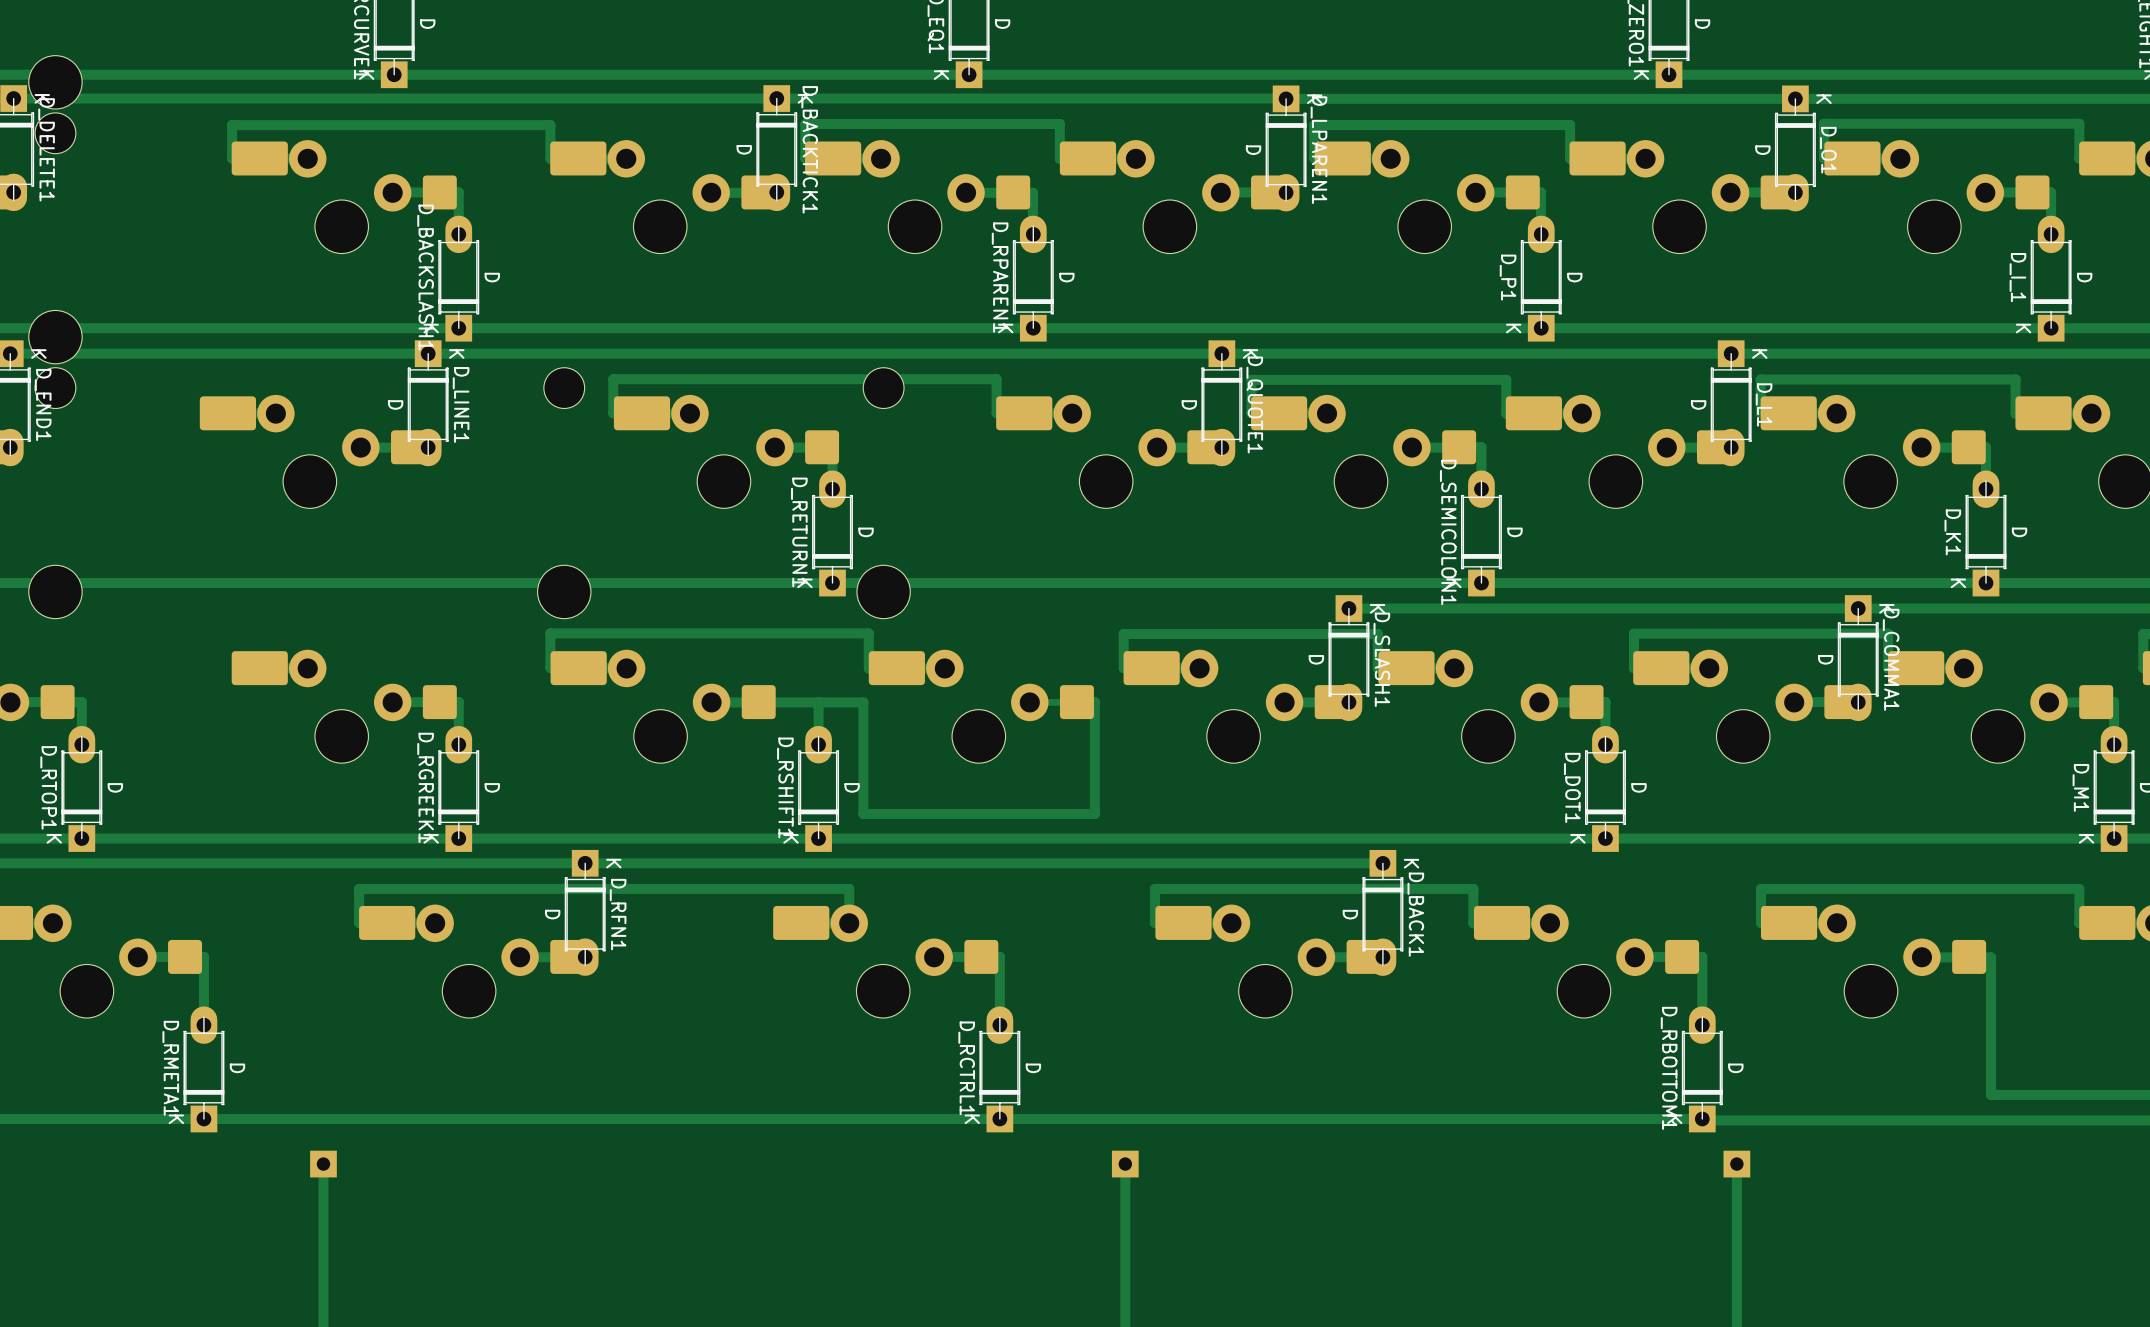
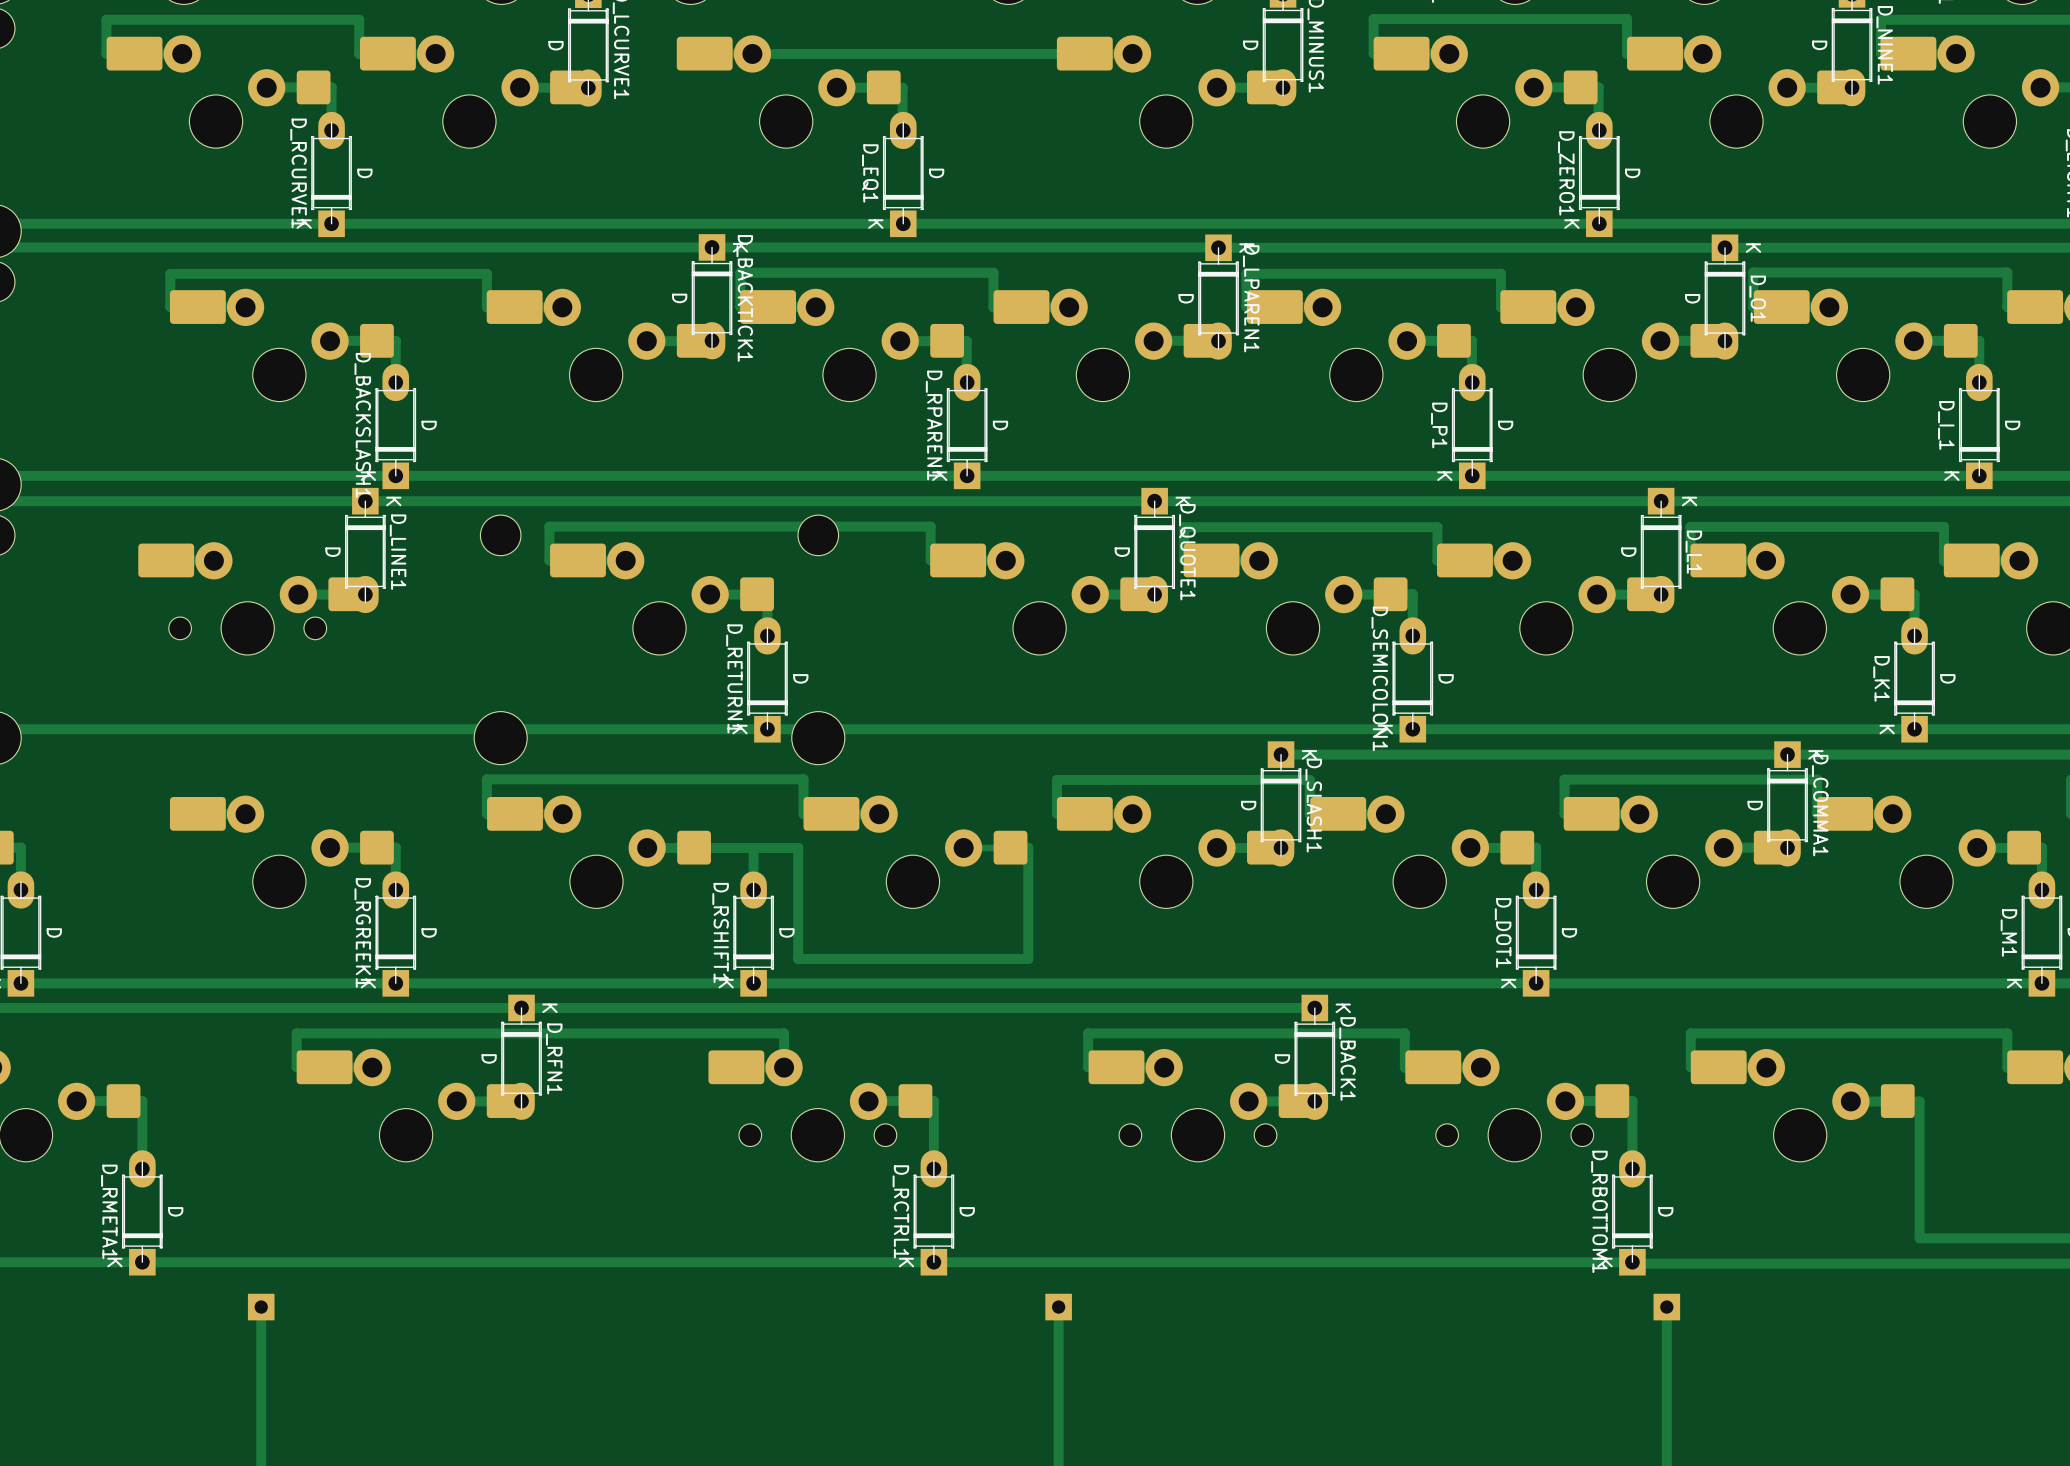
part footprint: [199, 394, 425, 509] -> [138, 542, 363, 655]
part footprint: [773, 904, 999, 1018] -> [708, 1048, 933, 1162]
part footprint: [1155, 904, 1381, 1018] -> [1088, 1048, 1313, 1162]
part footprint: [1473, 904, 1700, 1018] -> [1405, 1048, 1630, 1162]

